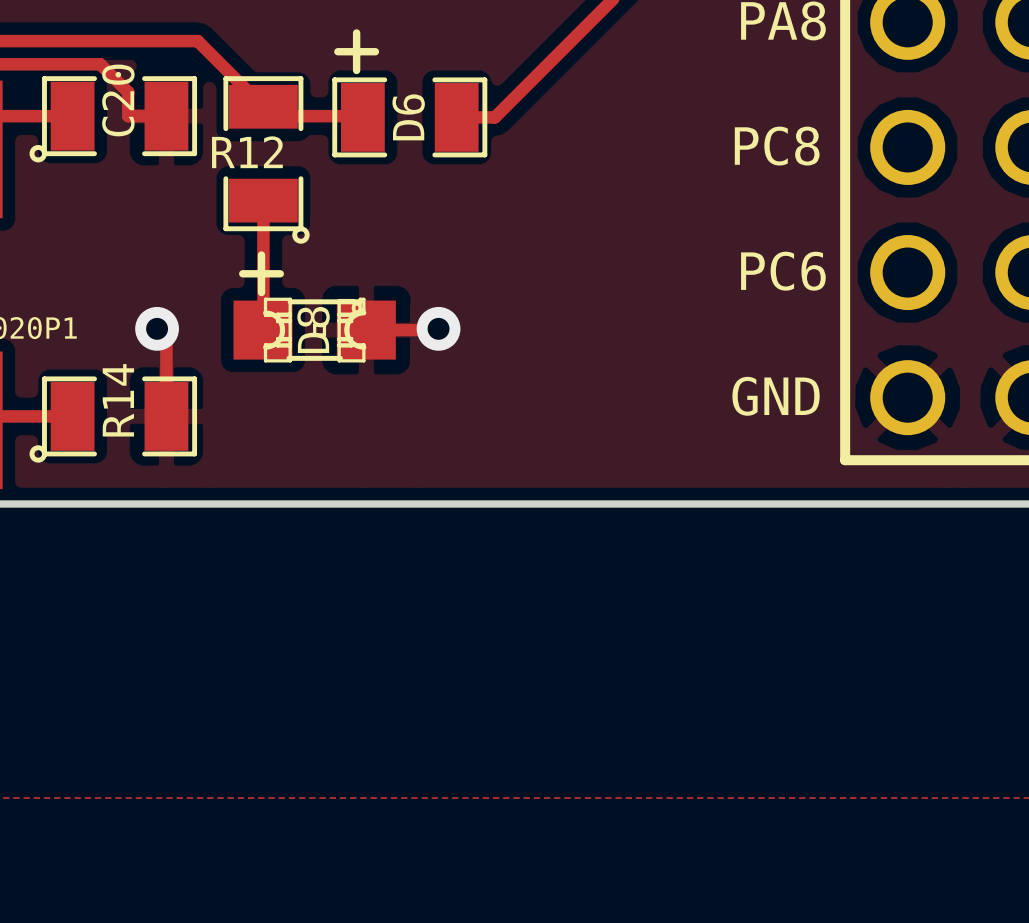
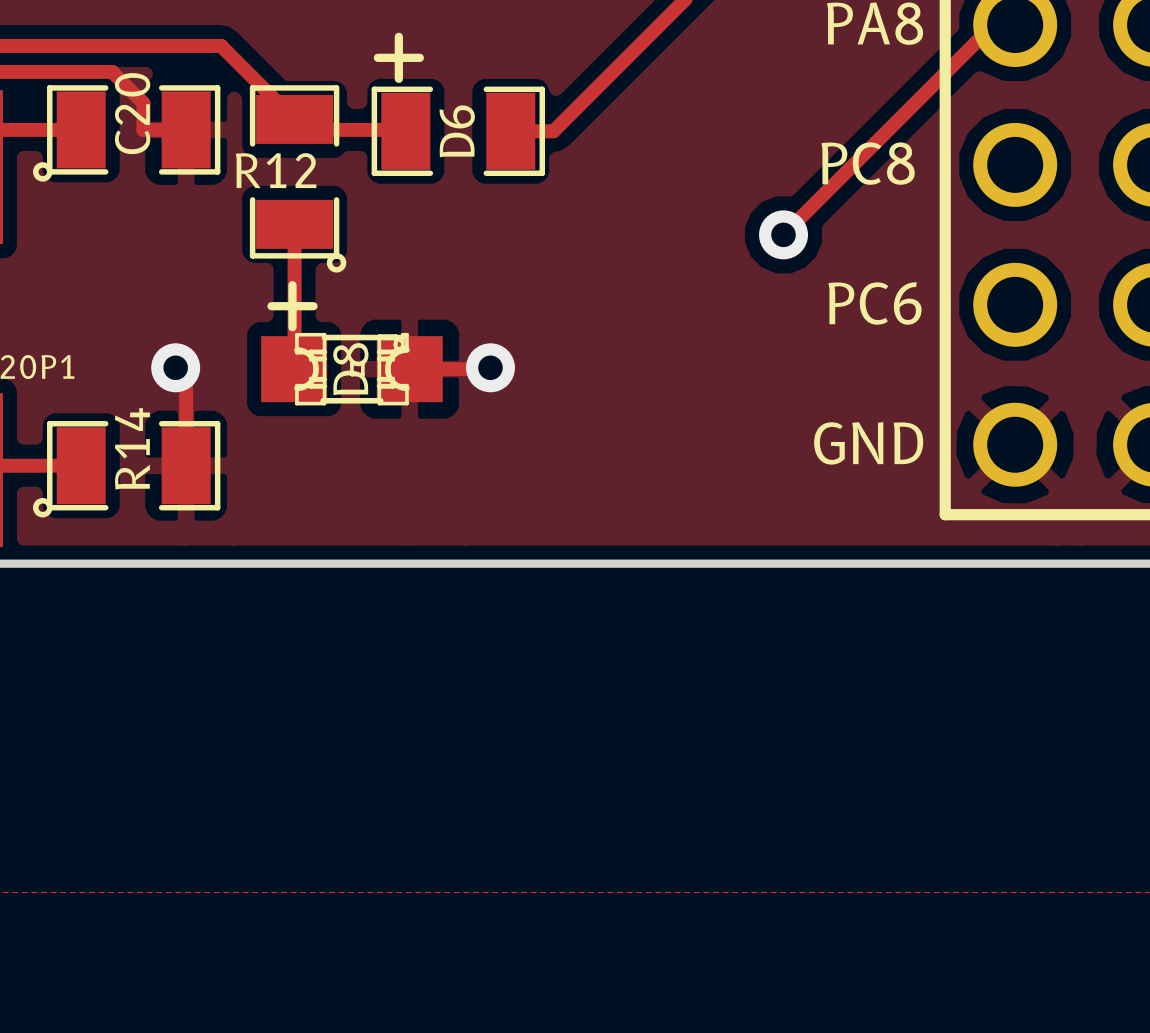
track: none -> (1015, 24) (993, 24) (783, 234)
via: none -> (783, 234)

